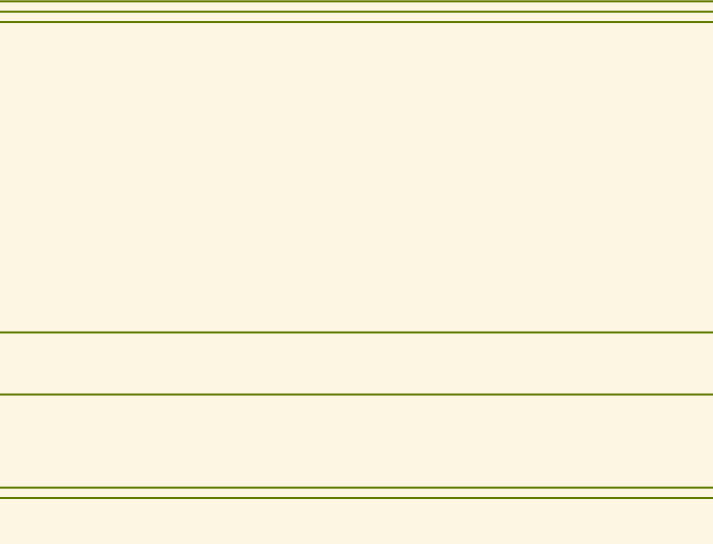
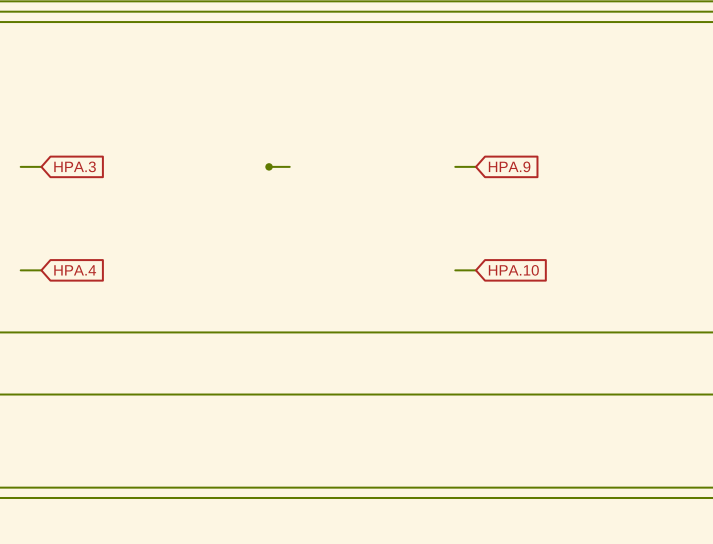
wire: none -> (20, 166) (41, 166)
global label: none -> HPA.3 (75, 166)
wire: none -> (269, 166) (289, 166)
junction: none -> (269, 166)
wire: none -> (455, 166) (475, 166)
global label: none -> HPA.9 (509, 166)
wire: none -> (20, 270) (41, 270)
global label: none -> HPA.4 (75, 270)
wire: none -> (455, 270) (475, 270)
global label: none -> HPA.10 (513, 270)

